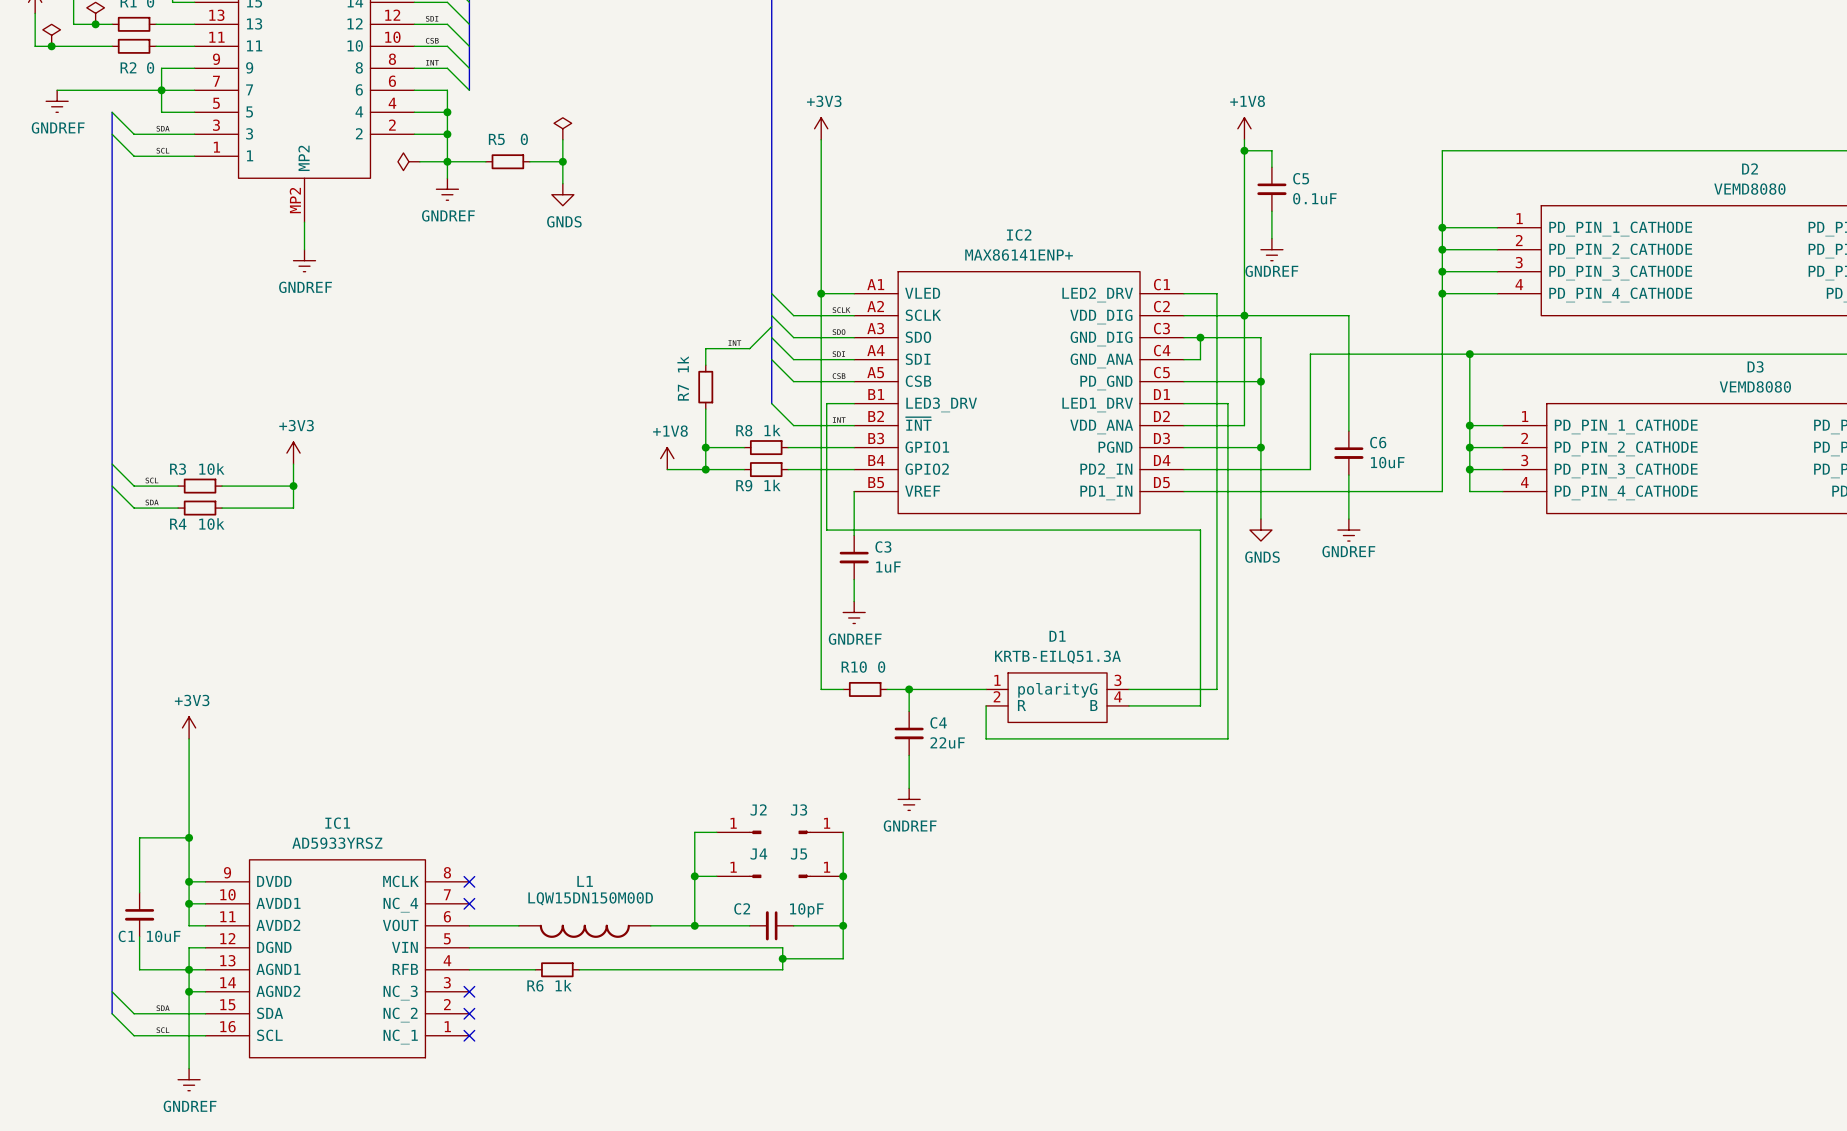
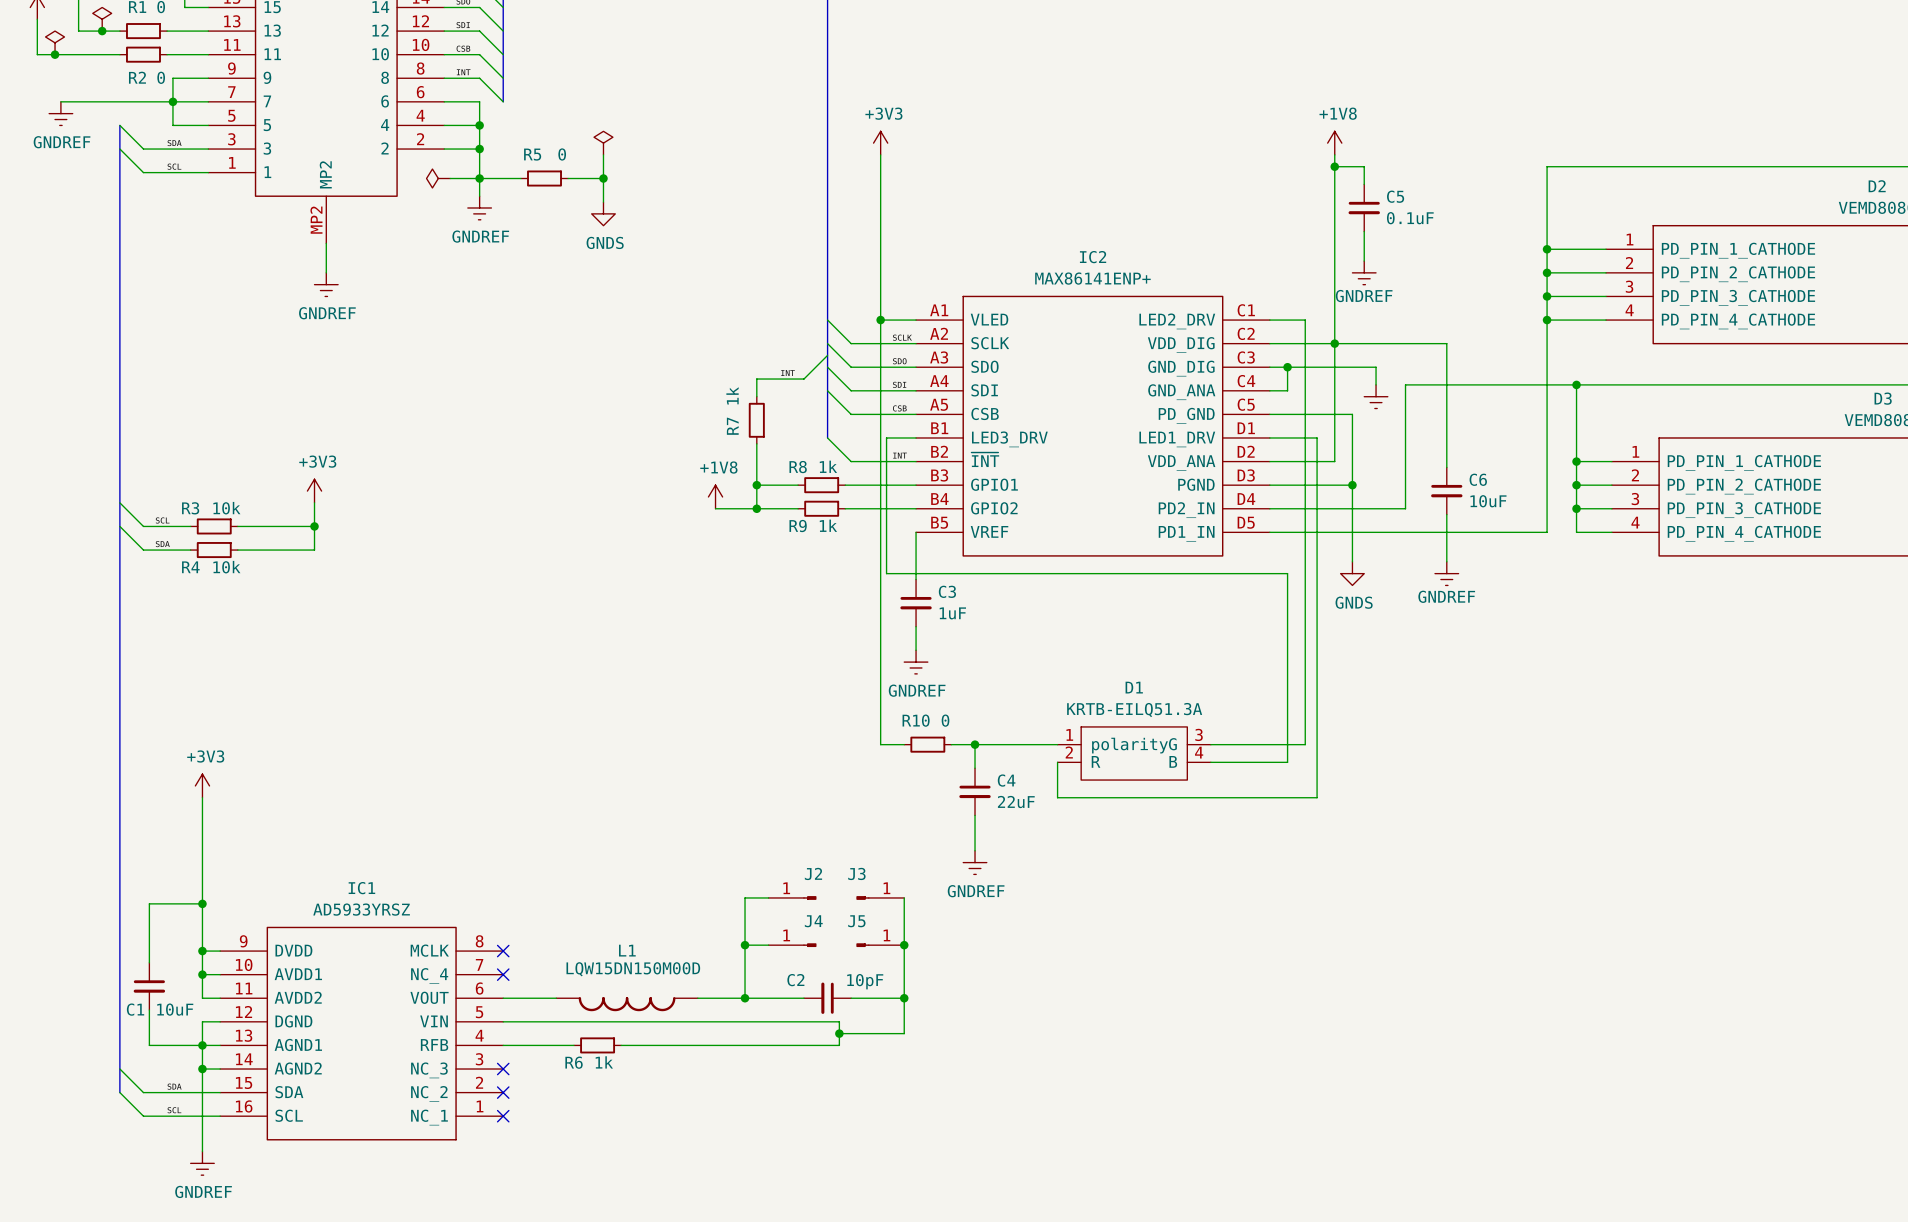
wire: (1260, 337) (1260, 381) -> (1352, 367) (1376, 367) (1376, 384)
power symbol: none -> (1376, 396)
junction: (1260, 381) -> none

